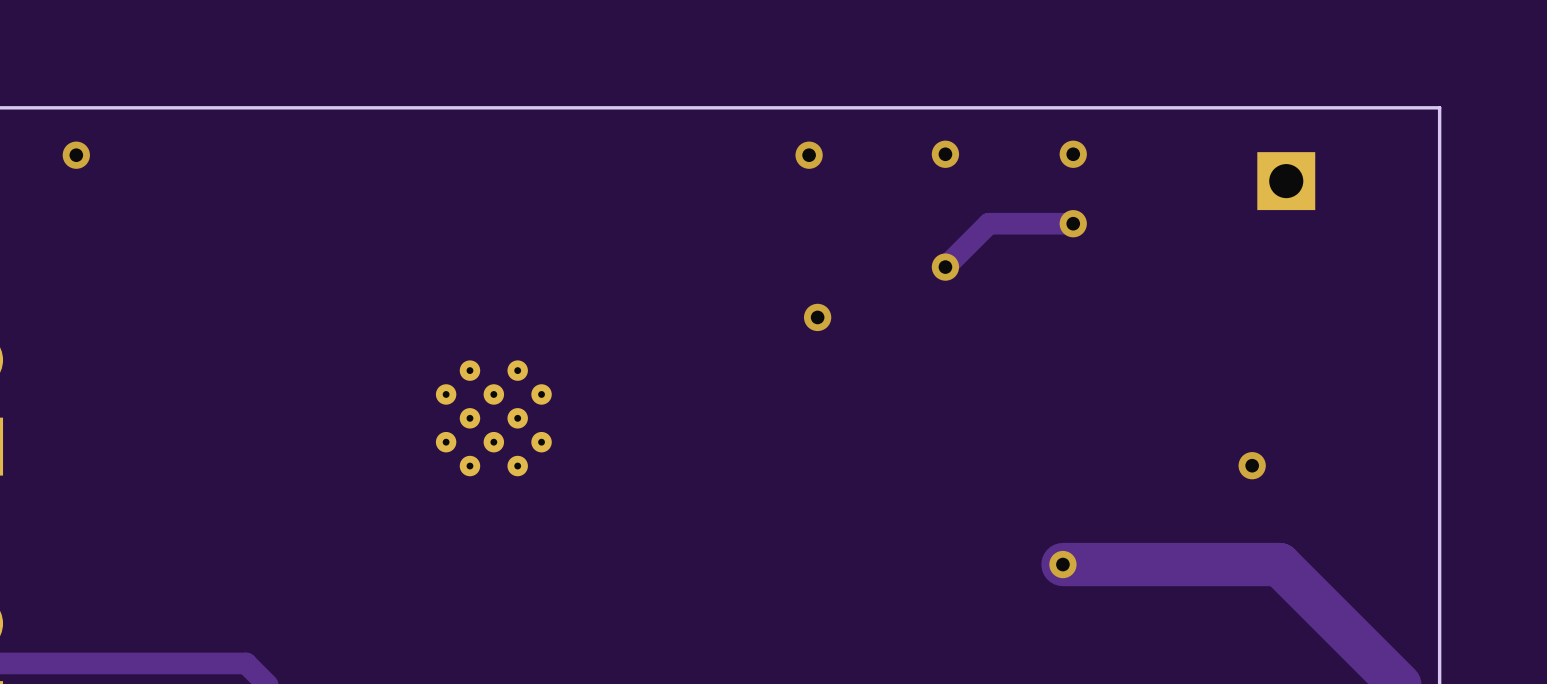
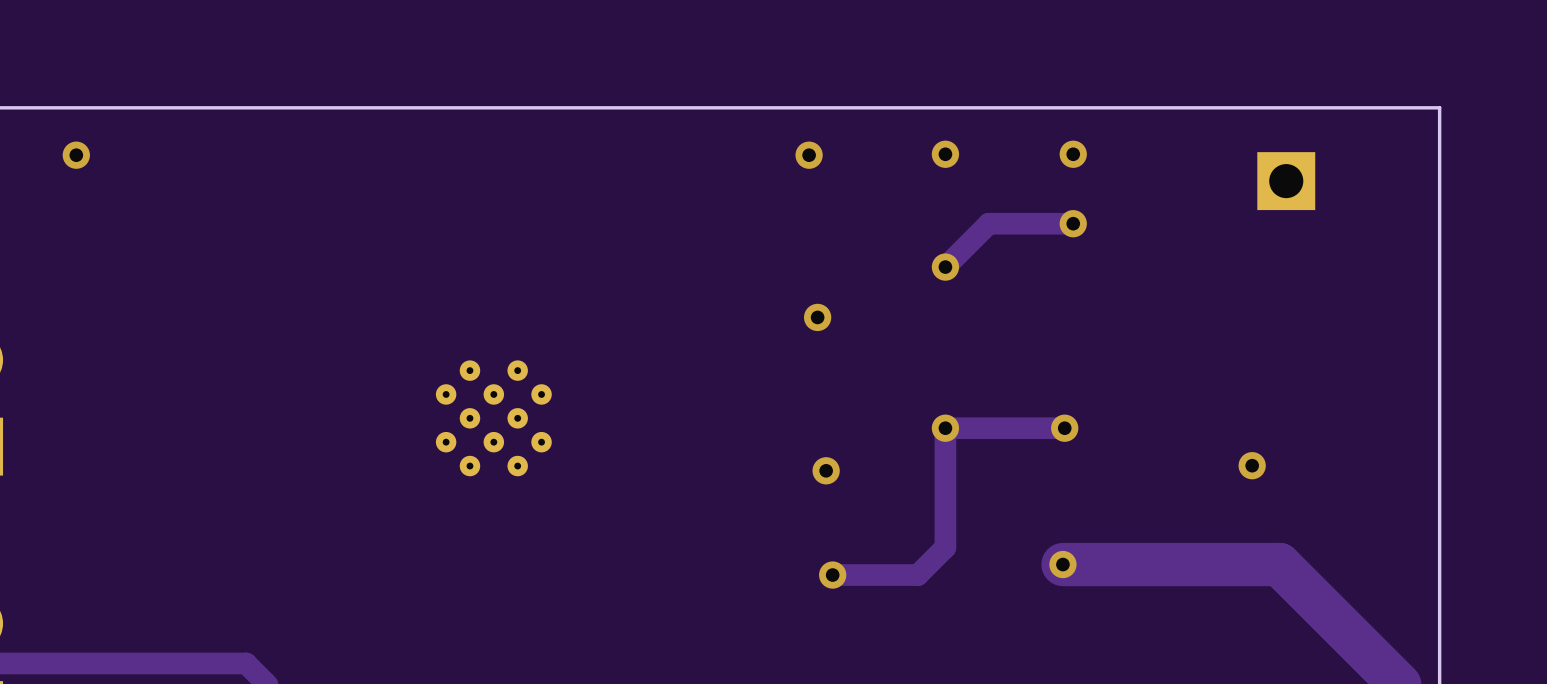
via: none -> (945, 428)
track: none -> (1064, 428) (945, 428) (945, 547) (917, 575) (832, 575)
via: none -> (1064, 428)
via: none -> (826, 470)
via: none -> (832, 575)

